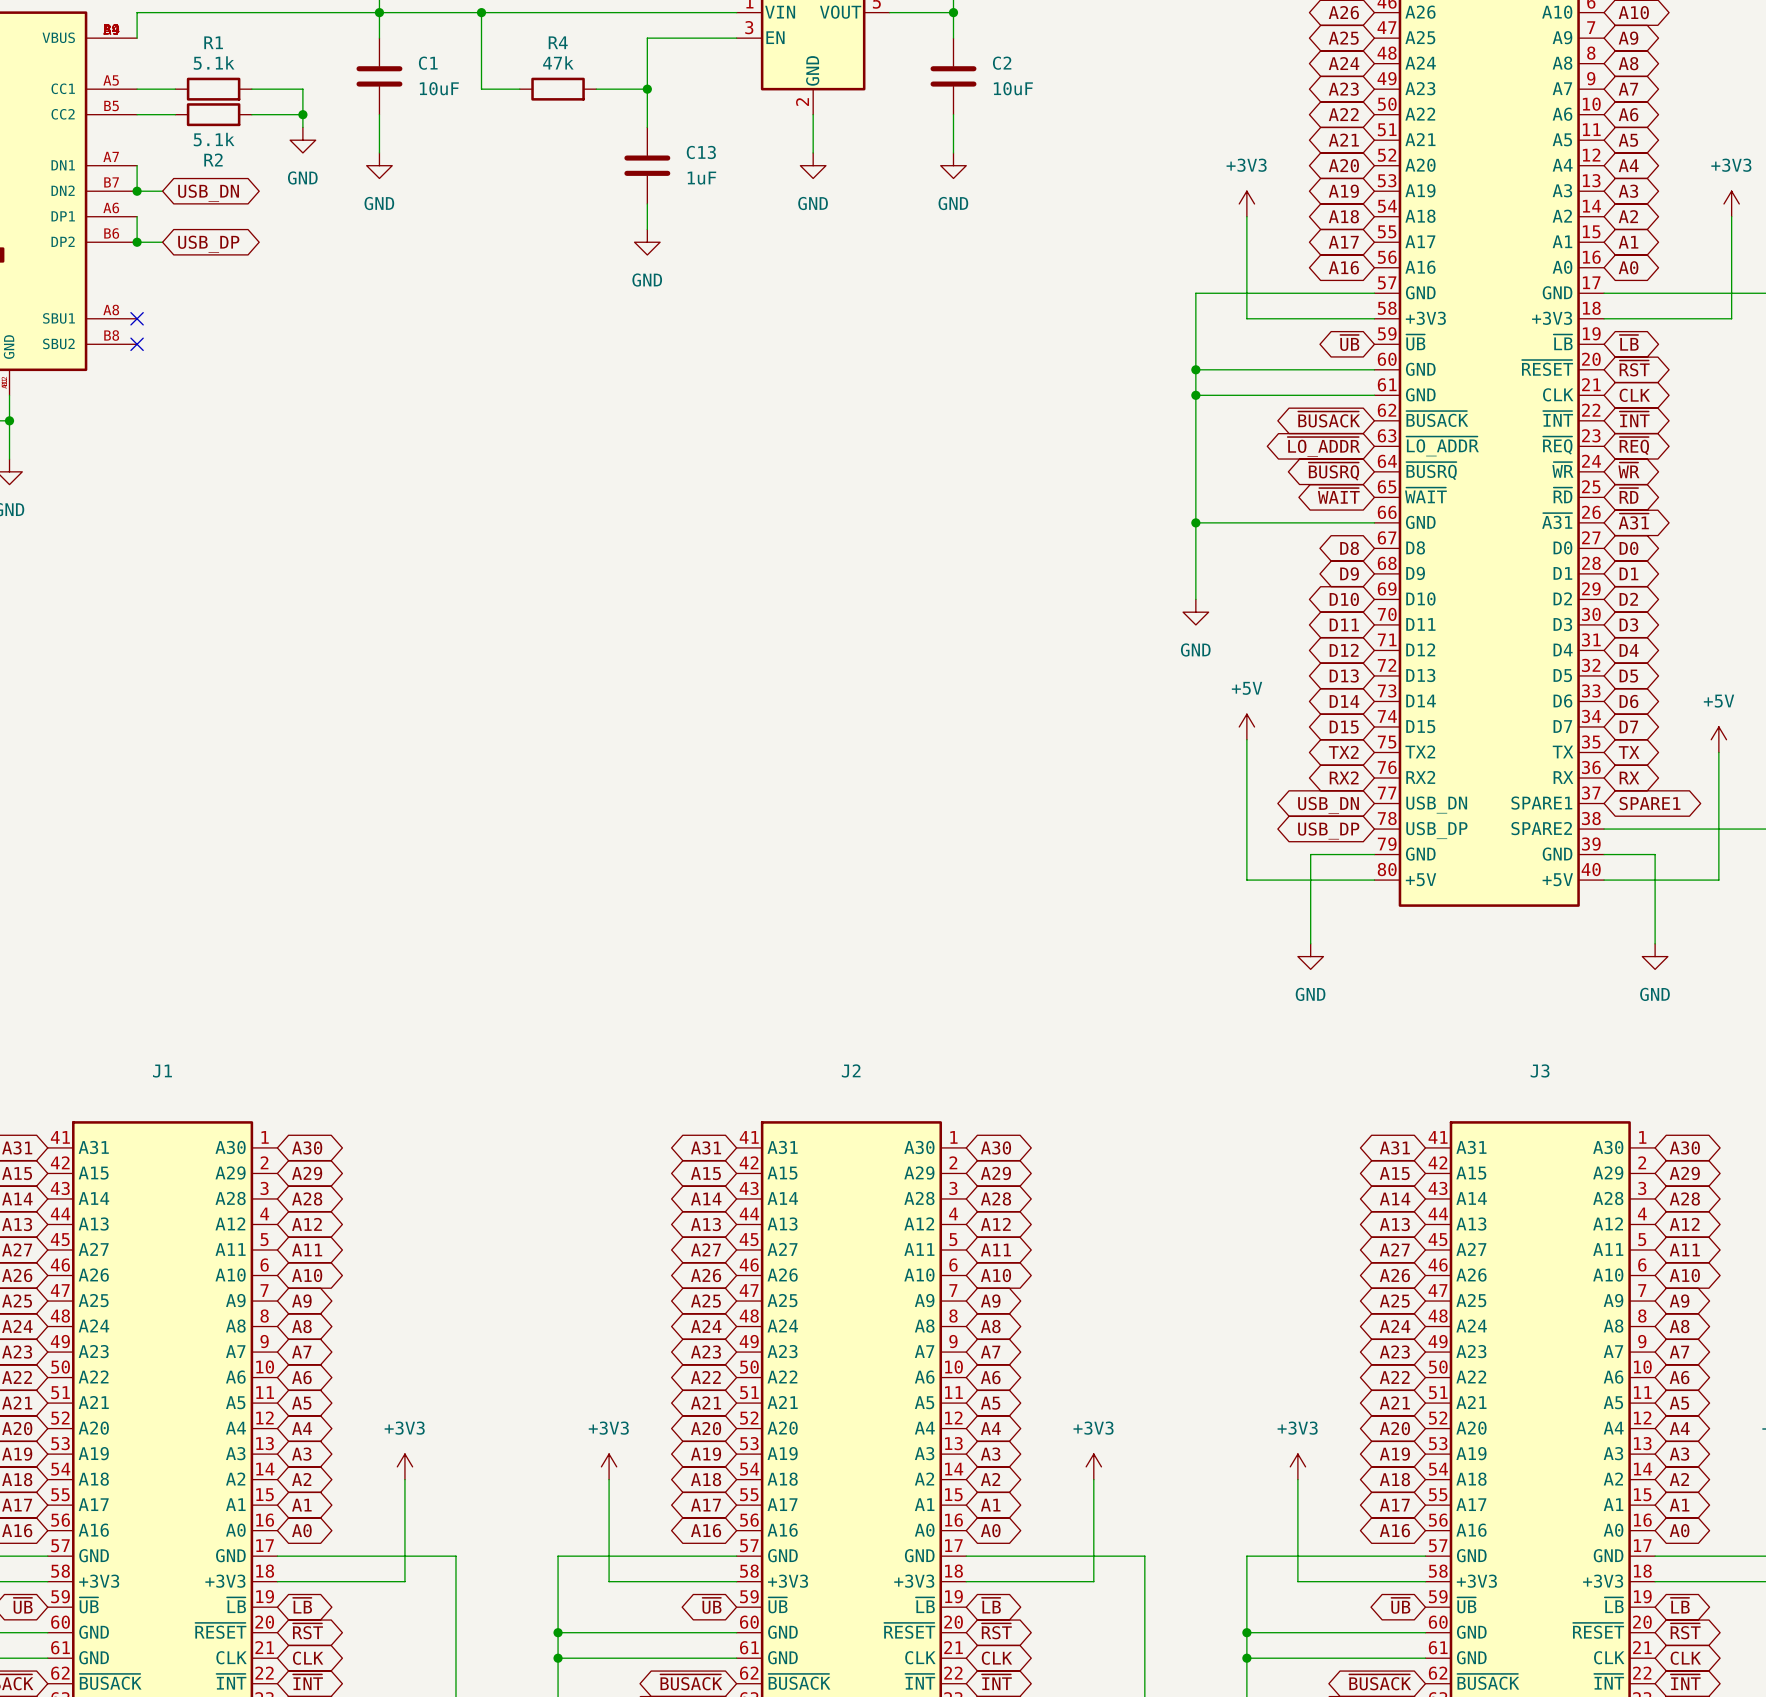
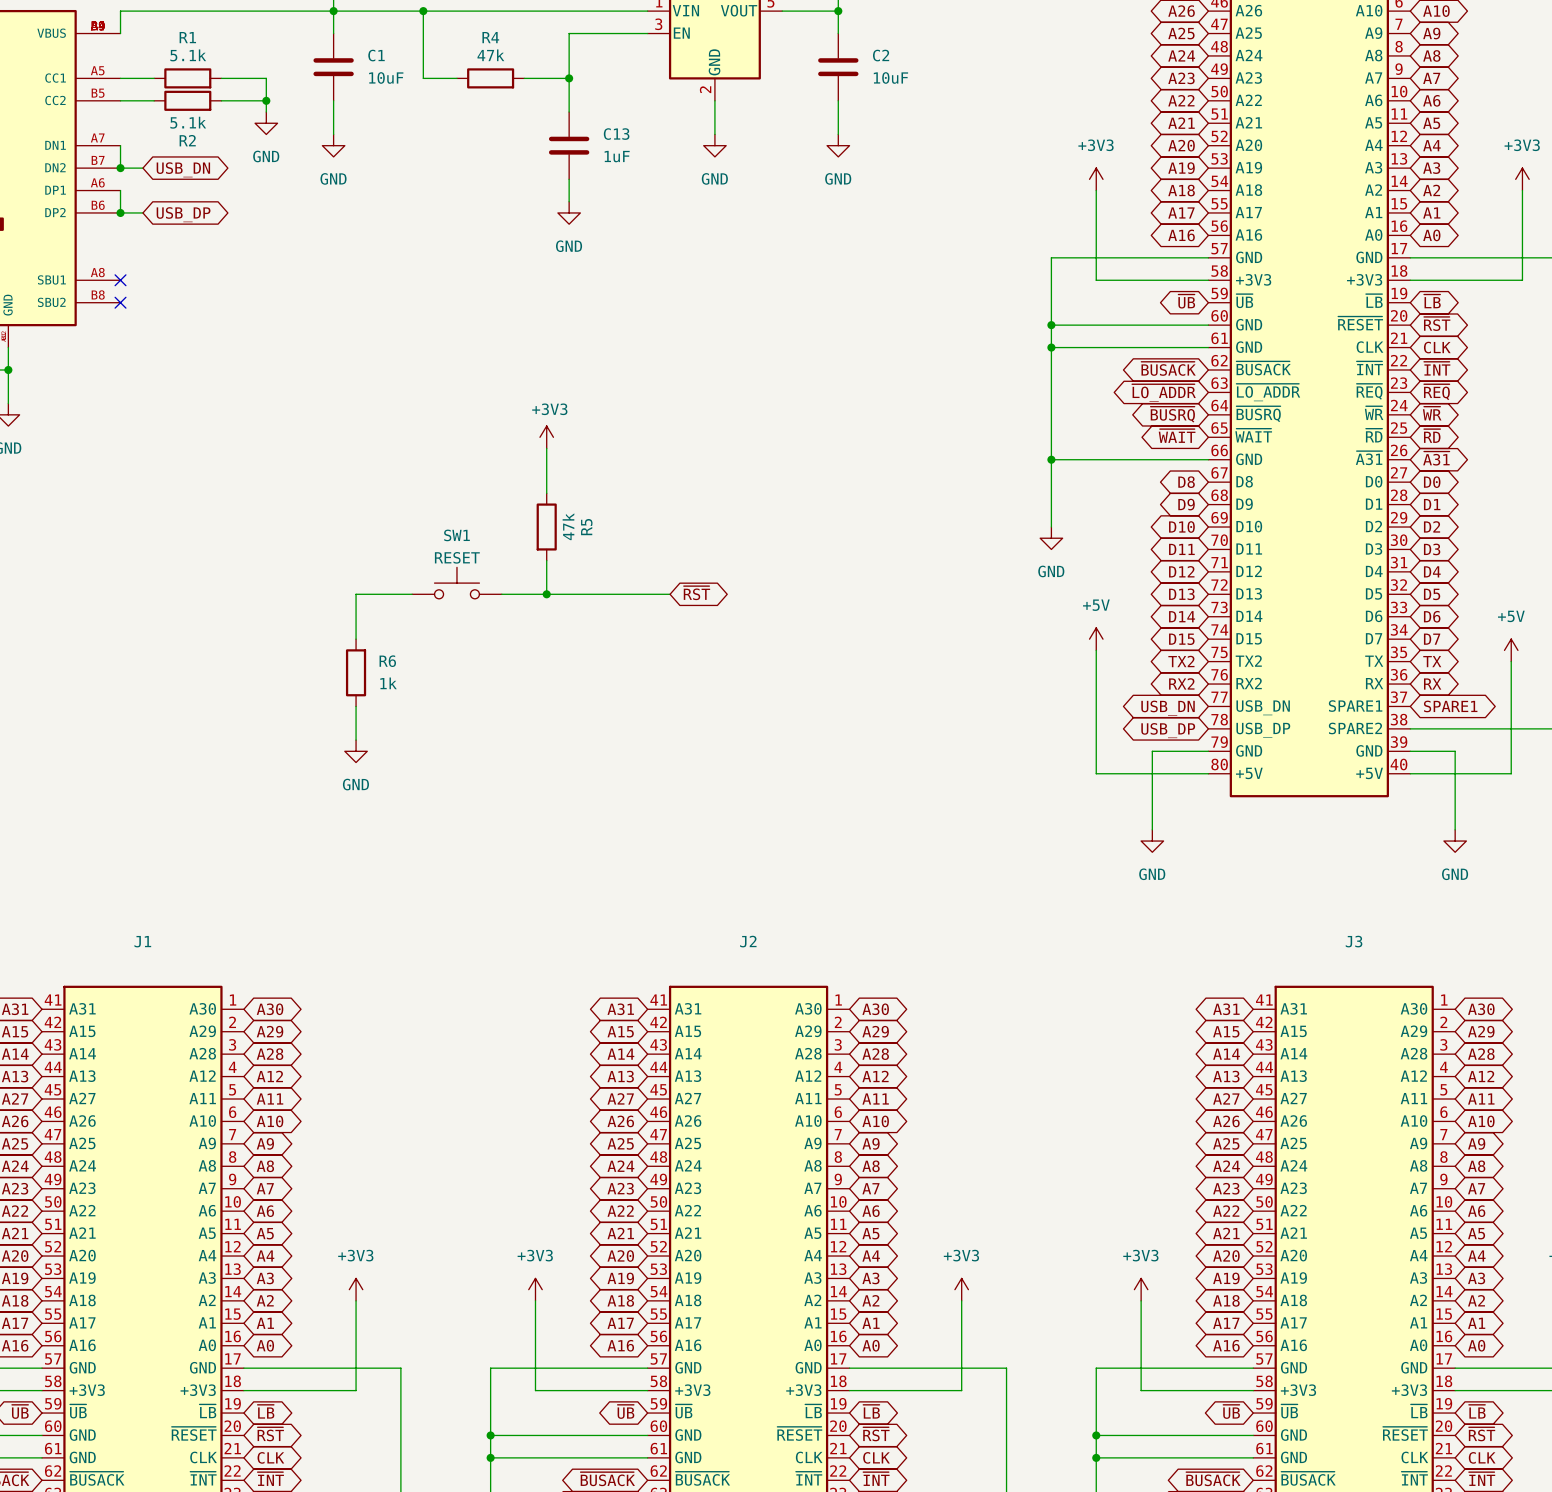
power symbol: none -> +3V3 (546, 437)
wire: none -> (546, 448) (546, 493)
R5: none -> 47k (546, 527)
wire: none -> (546, 560) (546, 594)
SW1: none -> RESET (456, 583)
global label: none -> ~{RST} (696, 593)
wire: none -> (412, 594) (356, 594) (356, 639)
wire: none -> (501, 594) (670, 594)
junction: none -> (546, 594)
R6: none -> 1k (356, 672)
wire: none -> (356, 706) (356, 740)
power symbol: none -> GND (356, 751)

